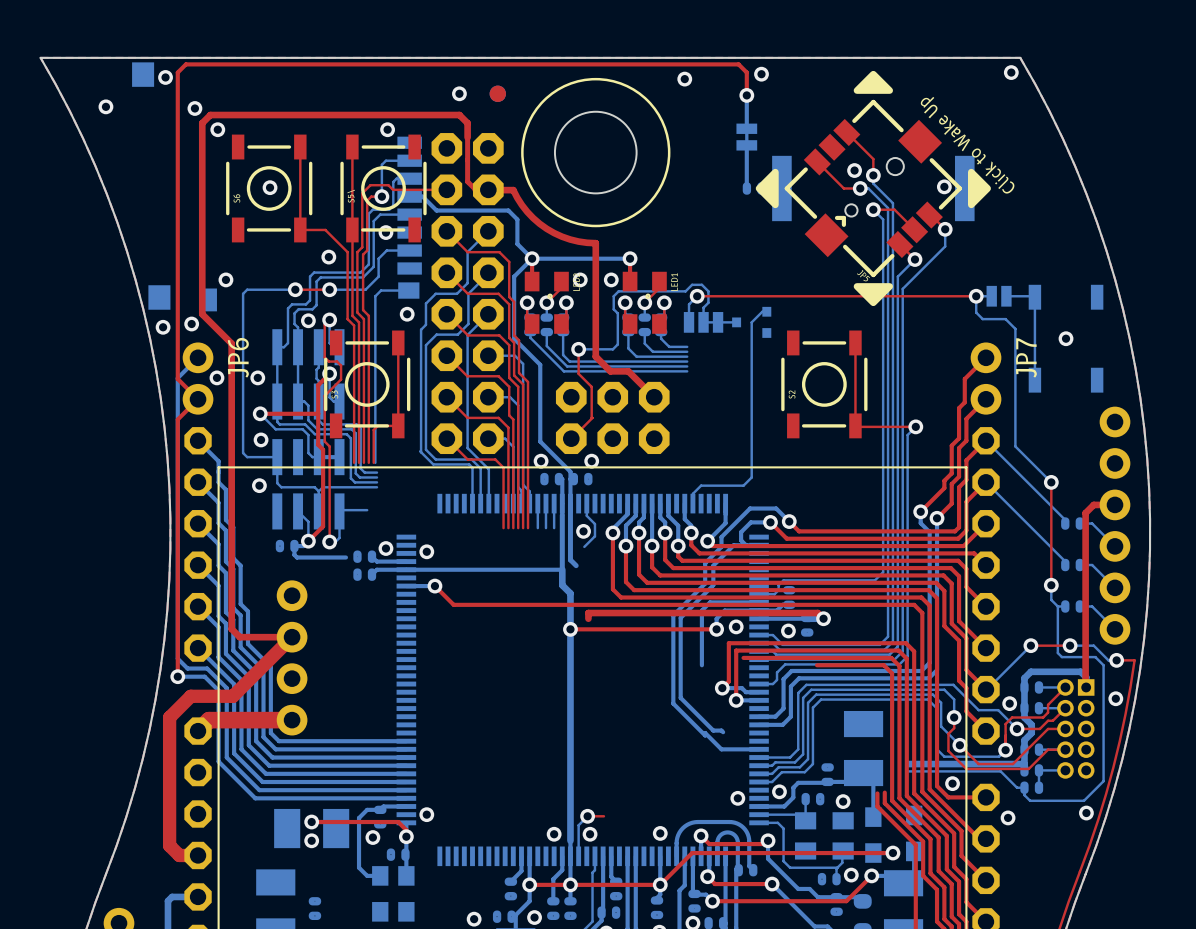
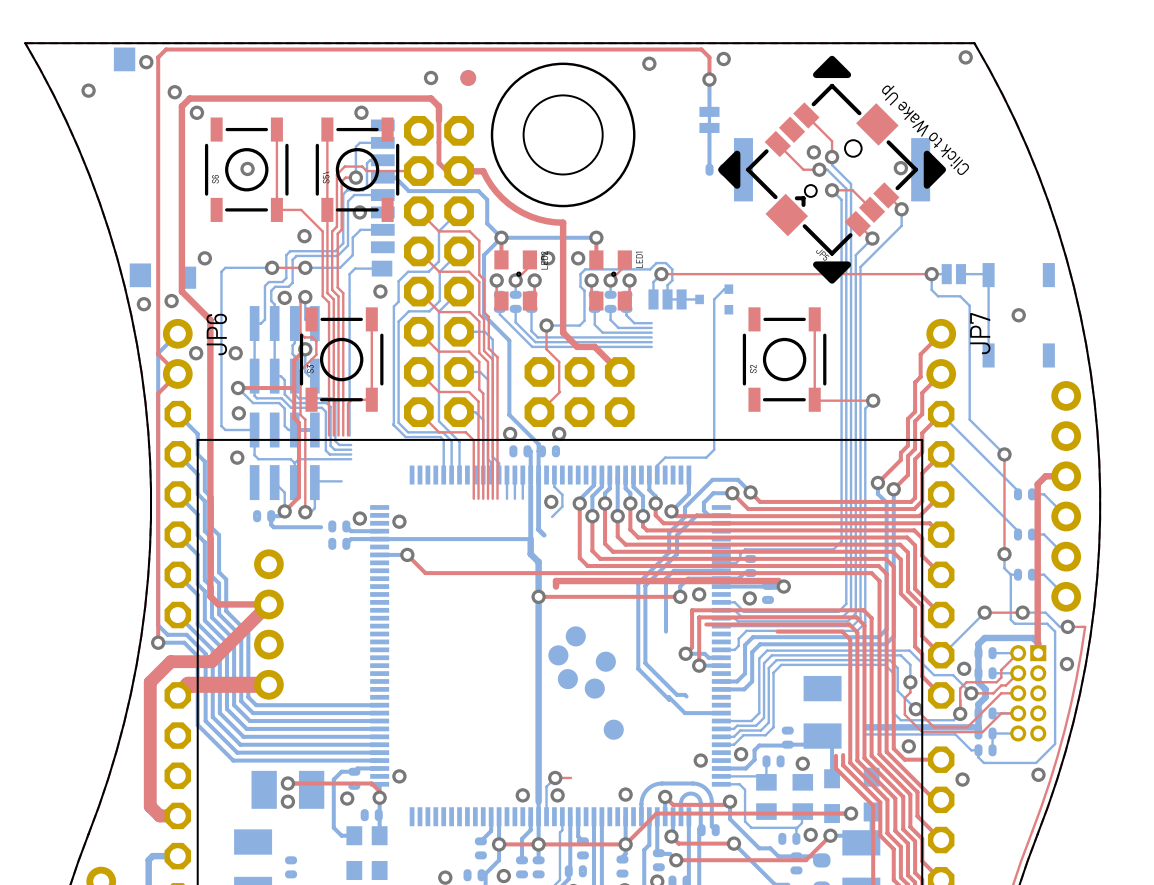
part: none -> (575, 636)
part: none -> (558, 655)
part: none -> (605, 661)
part: none -> (567, 679)
part: none -> (594, 688)
part: none -> (613, 729)

